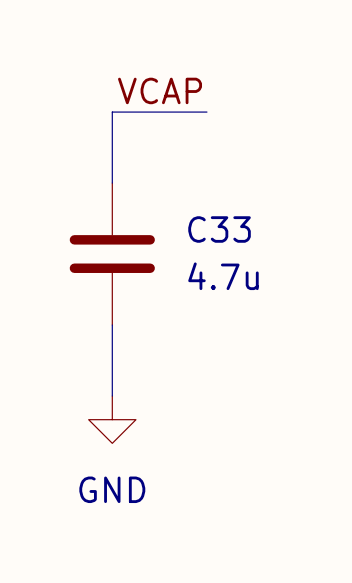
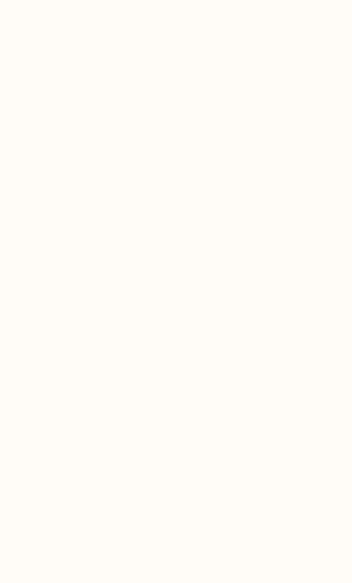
label: VCAP (160, 90) -> none
wire: (206, 112) (112, 112) (112, 183) -> none
C33: 4.7u (112, 254) -> none
wire: (112, 325) (112, 396) -> none
power symbol: GND (112, 419) -> none

